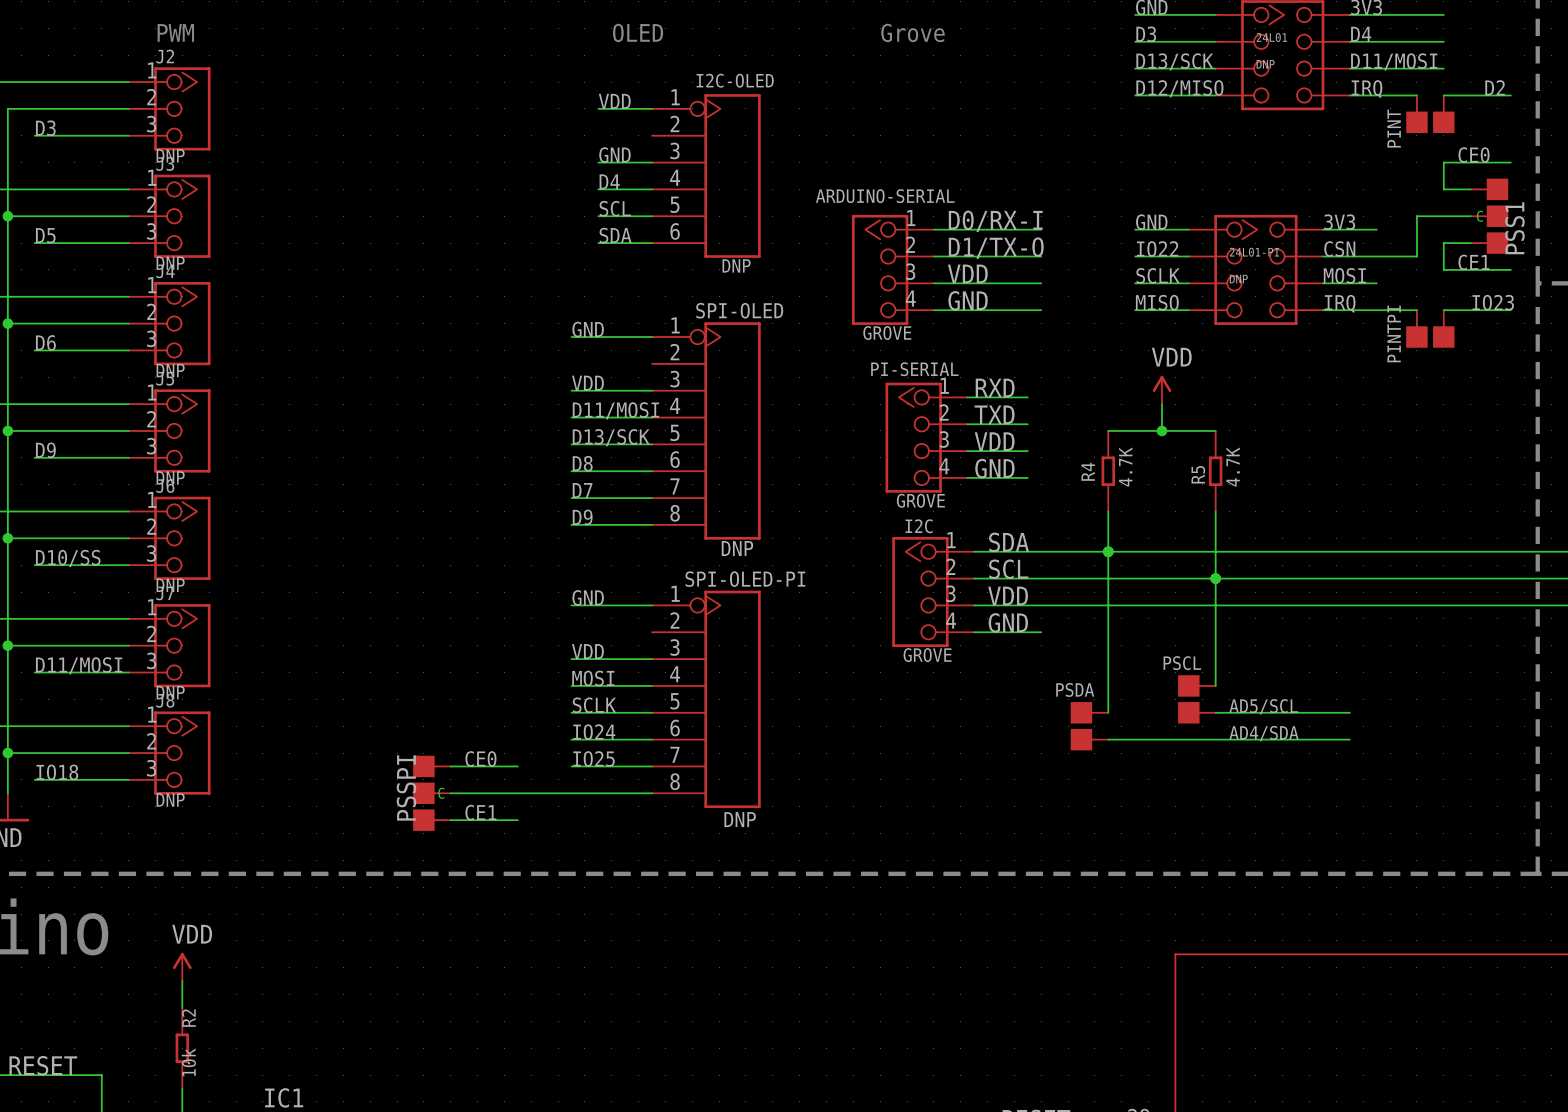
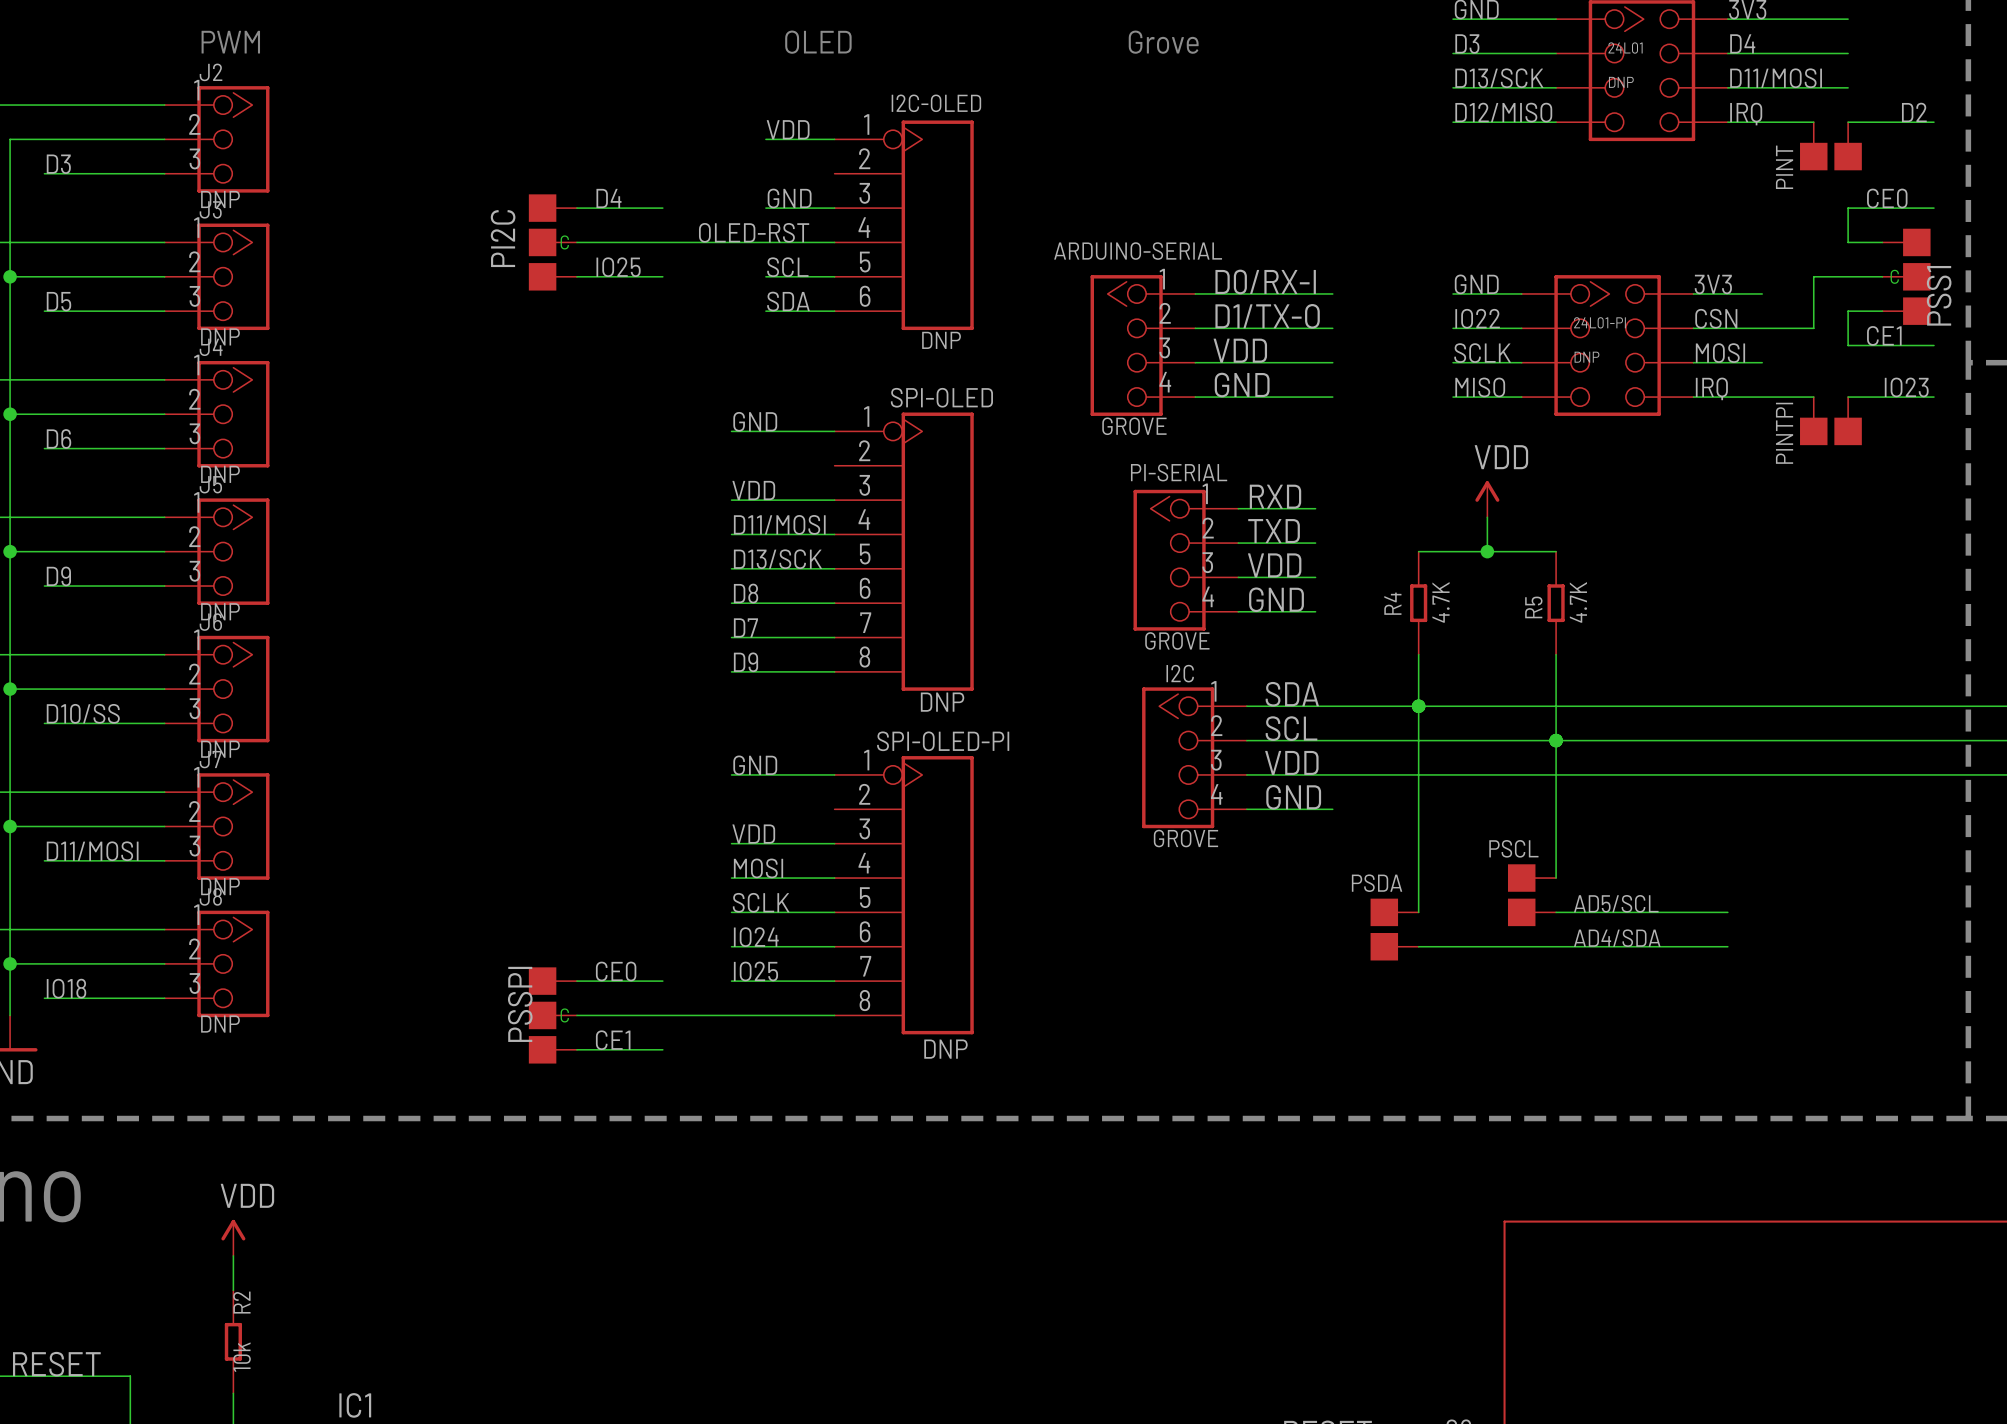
wire: none -> (576, 208) (662, 208)
label: none -> OLED-RST (754, 232)
label position: D4 (609, 181) -> D4 (608, 198)
PI2C: none -> (552, 242)
wire: none -> (576, 242) (765, 242)
label: none -> IO25 (618, 267)
wire: none -> (576, 276) (662, 276)

